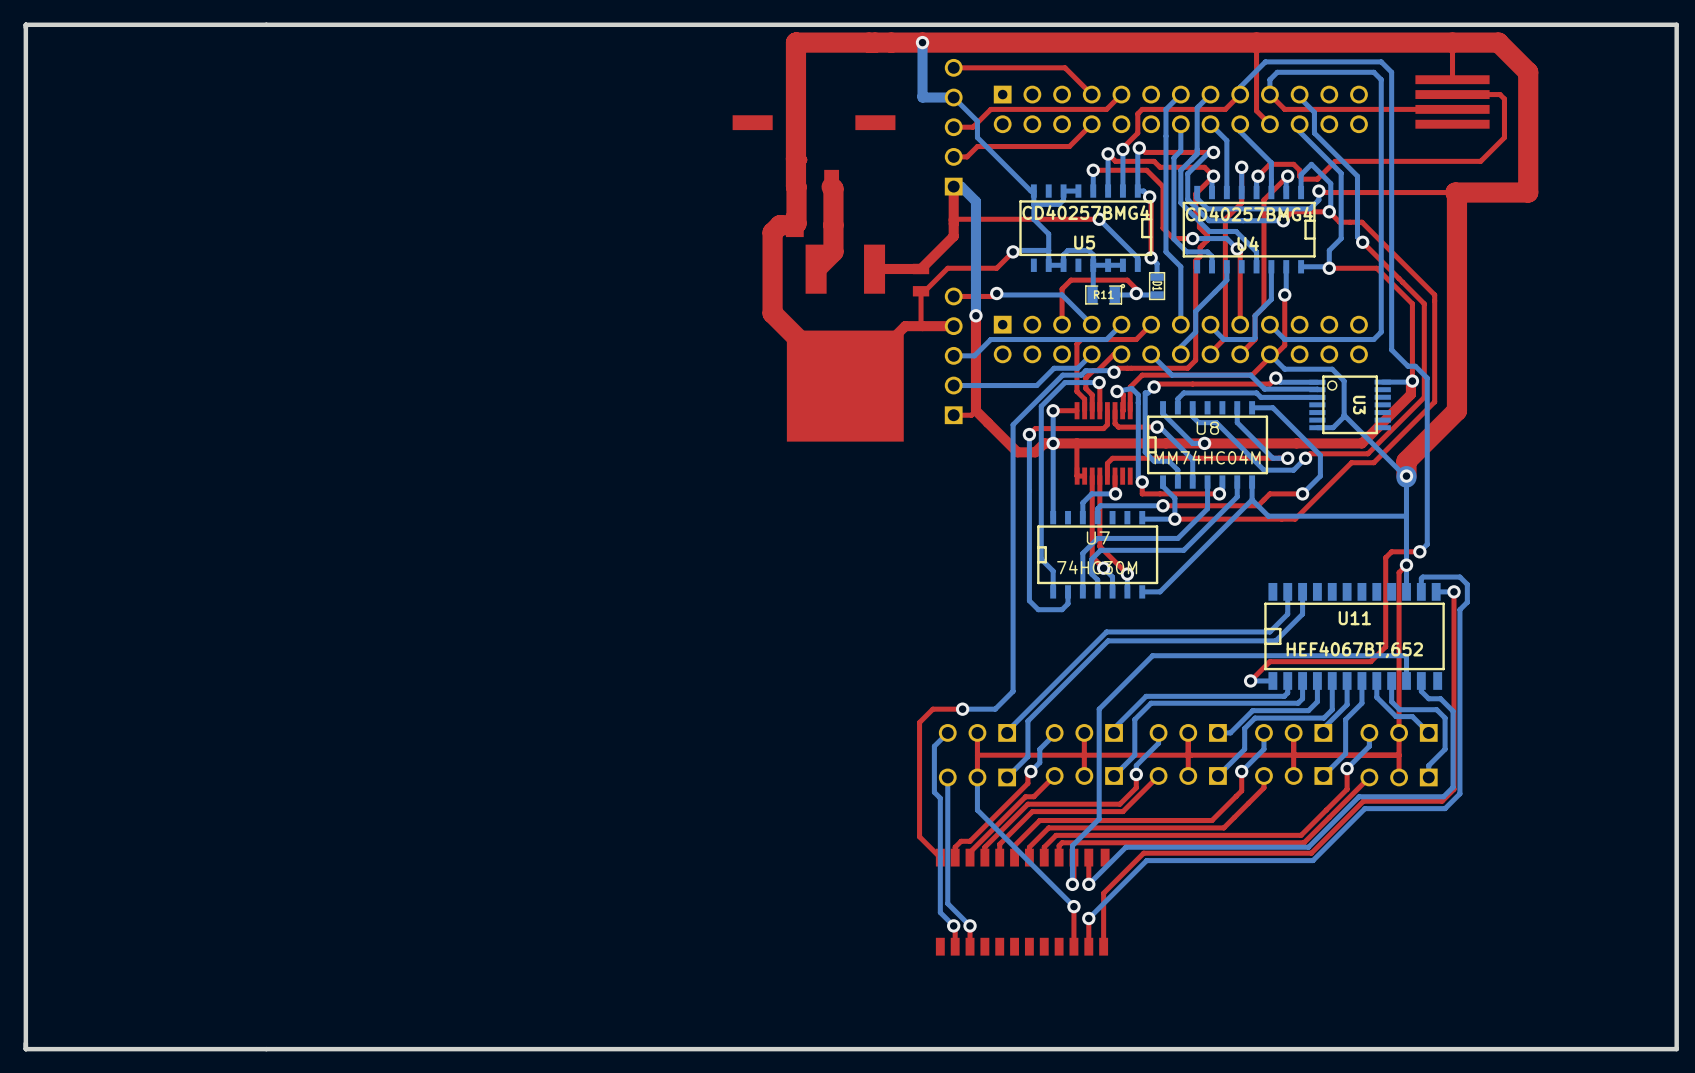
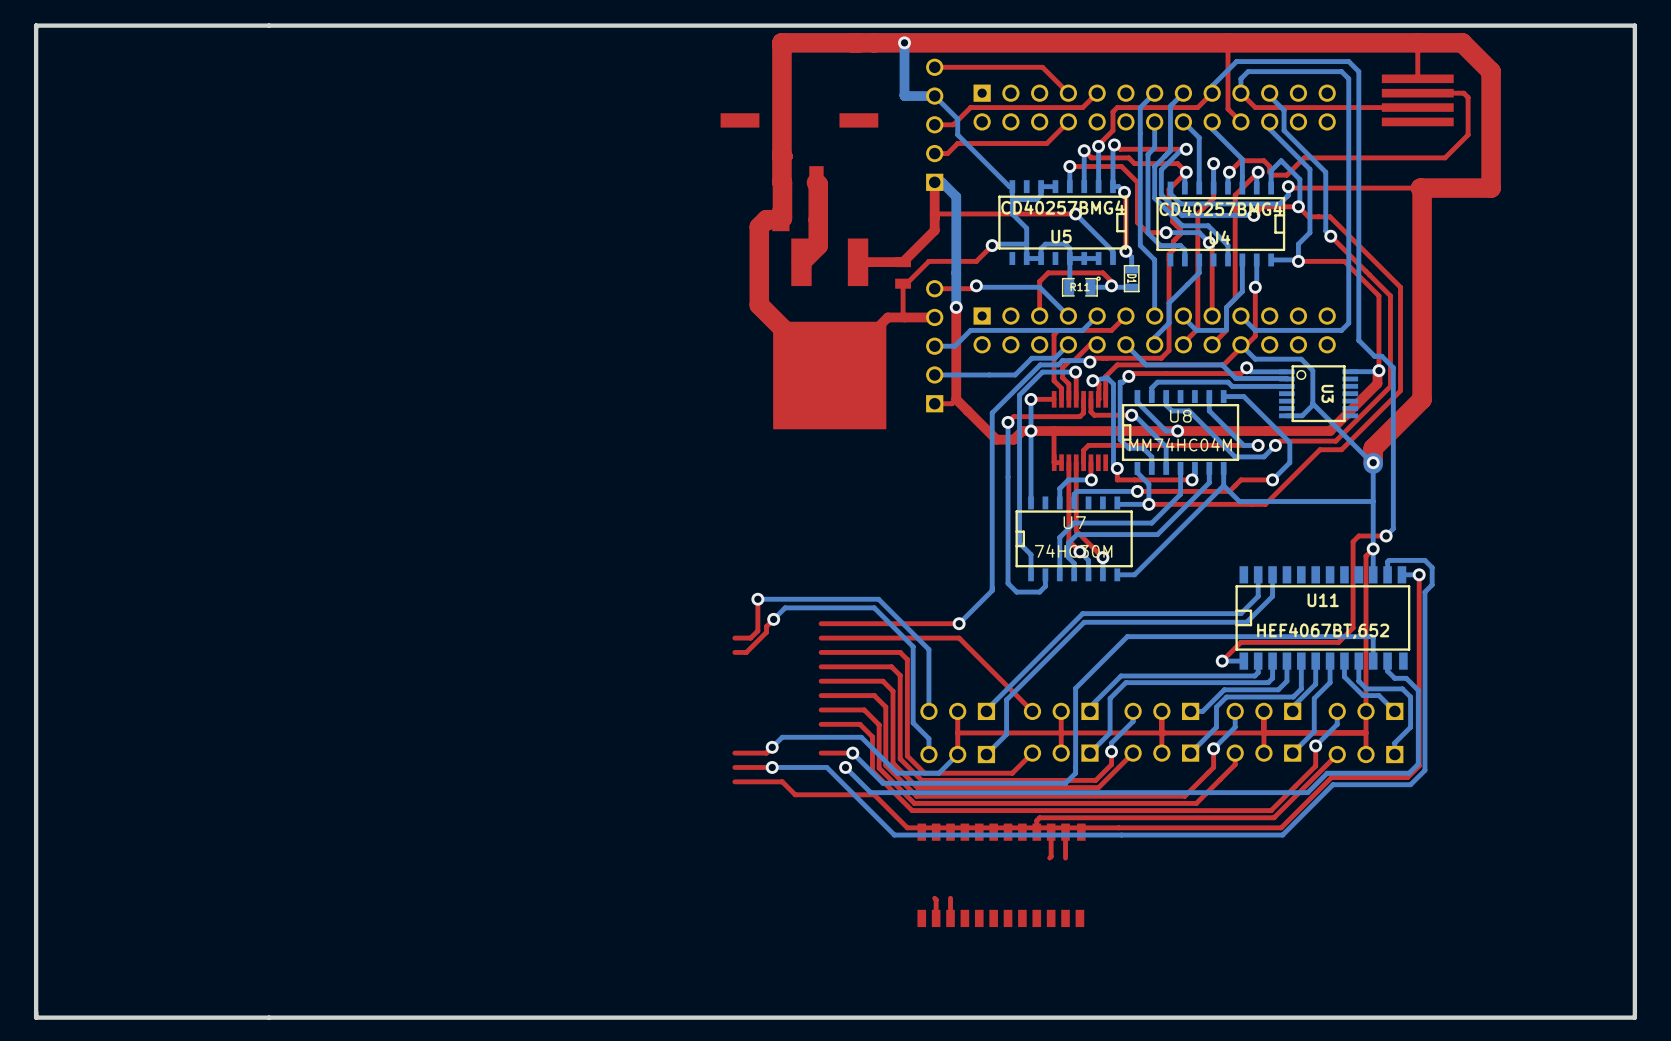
bottom track: (1013, 608) (1013, 691) (995, 709) (962, 709) -> (992, 590) (959, 623)
top track: none -> (757, 599) (757, 630) (750, 638) (734, 638)
via: none -> (757, 599)
top track: none -> (773, 619) (766, 626) (766, 632) (746, 652) (734, 652)
via: none -> (773, 619)
top track: none -> (959, 623) (821, 623)
via: none -> (959, 623)
top track: none -> (821, 638) (959, 638) (1032, 711)
top track: (962, 709) (932, 709) (919, 722) (919, 836) (940, 857) -> none
via: (962, 709) -> none
bottom track: (947, 732) (934, 746) (934, 792) (940, 798) (940, 912) (953, 925) -> (928, 711) (928, 649) (878, 599) (757, 599)
bottom track: (1054, 732) (1039, 749) (1039, 762) (1030, 771) -> none
top track: none -> (772, 747) (766, 753) (734, 753)
via: none -> (772, 747)
top track: (1030, 771) (1027, 774) (1027, 783) (970, 841) (961, 841) (955, 847) (955, 857) -> none
via: (1030, 771) -> none
top track: none -> (852, 753) (821, 753)
via: none -> (852, 753)
bottom track: (947, 777) (947, 903) (970, 925) -> (928, 754) (928, 738) (913, 722) (913, 646) (874, 607) (785, 607) (773, 619)
bottom track: (977, 777) (977, 810) (1073, 906) -> (957, 754) (939, 773) (897, 773) (861, 737) (782, 737) (772, 747)
top track: none -> (772, 767) (734, 767)
via: none -> (772, 767)
via: none -> (845, 767)
top track: (1025, 796) (970, 852) (970, 857) -> (1004, 773) (924, 773) (907, 755) (907, 659) (900, 652) (821, 652)
bottom track: (1099, 796) (1099, 819) (1072, 845) (1072, 884) -> (1075, 773) (1065, 783) (882, 783) (852, 753)
top track: (1027, 804) (984, 847) (984, 857) -> (1006, 780) (921, 780) (900, 758) (900, 675) (891, 666) (821, 666)
top track: (1032, 811) (999, 844) (999, 857) -> (1010, 787) (917, 787) (893, 763) (893, 691) (882, 681) (821, 681)
bottom track: (1338, 816) (1308, 847) (1125, 847) (1088, 884) -> (1307, 792) (870, 792) (845, 767)
top track: (1039, 820) (1014, 845) (1014, 857) -> (1018, 796) (916, 796) (885, 765) (885, 707) (874, 695) (821, 695)
top track: (1048, 827) (1029, 847) (1029, 857) -> (1026, 803) (914, 803) (879, 768) (879, 724) (864, 709) (821, 709)
top track: (1056, 835) (1044, 847) (1044, 857) -> (1033, 810) (912, 810) (872, 770) (872, 736) (859, 724) (821, 724)
top track: (1143, 853) (1103, 893) (1103, 946) -> (1118, 827) (907, 827) (874, 794) (795, 794) (782, 781) (734, 781)
bottom track: (1146, 860) (1088, 918) -> (1121, 835) (894, 835) (826, 767) (772, 767)
via: (1072, 884) -> none
via: (1088, 884) -> none
top track: (1073, 906) (1073, 946) -> none
via: (1073, 906) -> none
top track: (1088, 918) (1088, 946) -> none
via: (1088, 918) -> none
via: (953, 925) -> none
via: (970, 925) -> none

